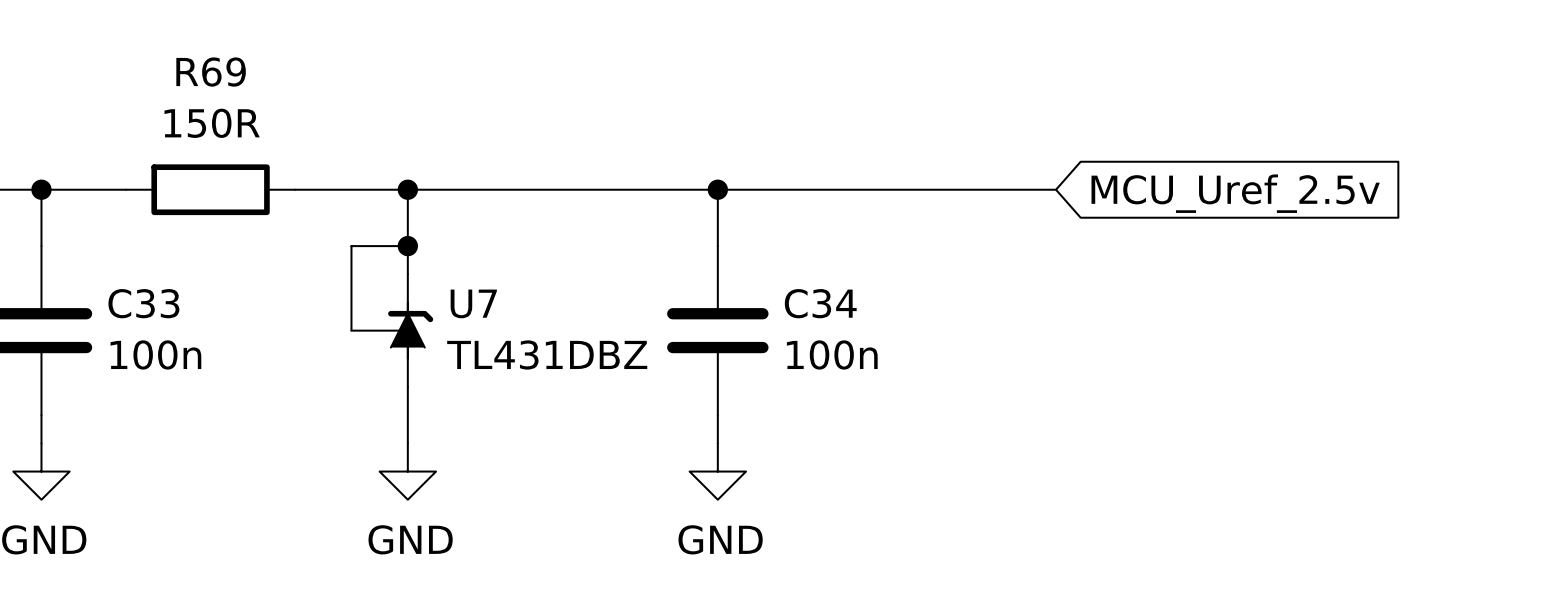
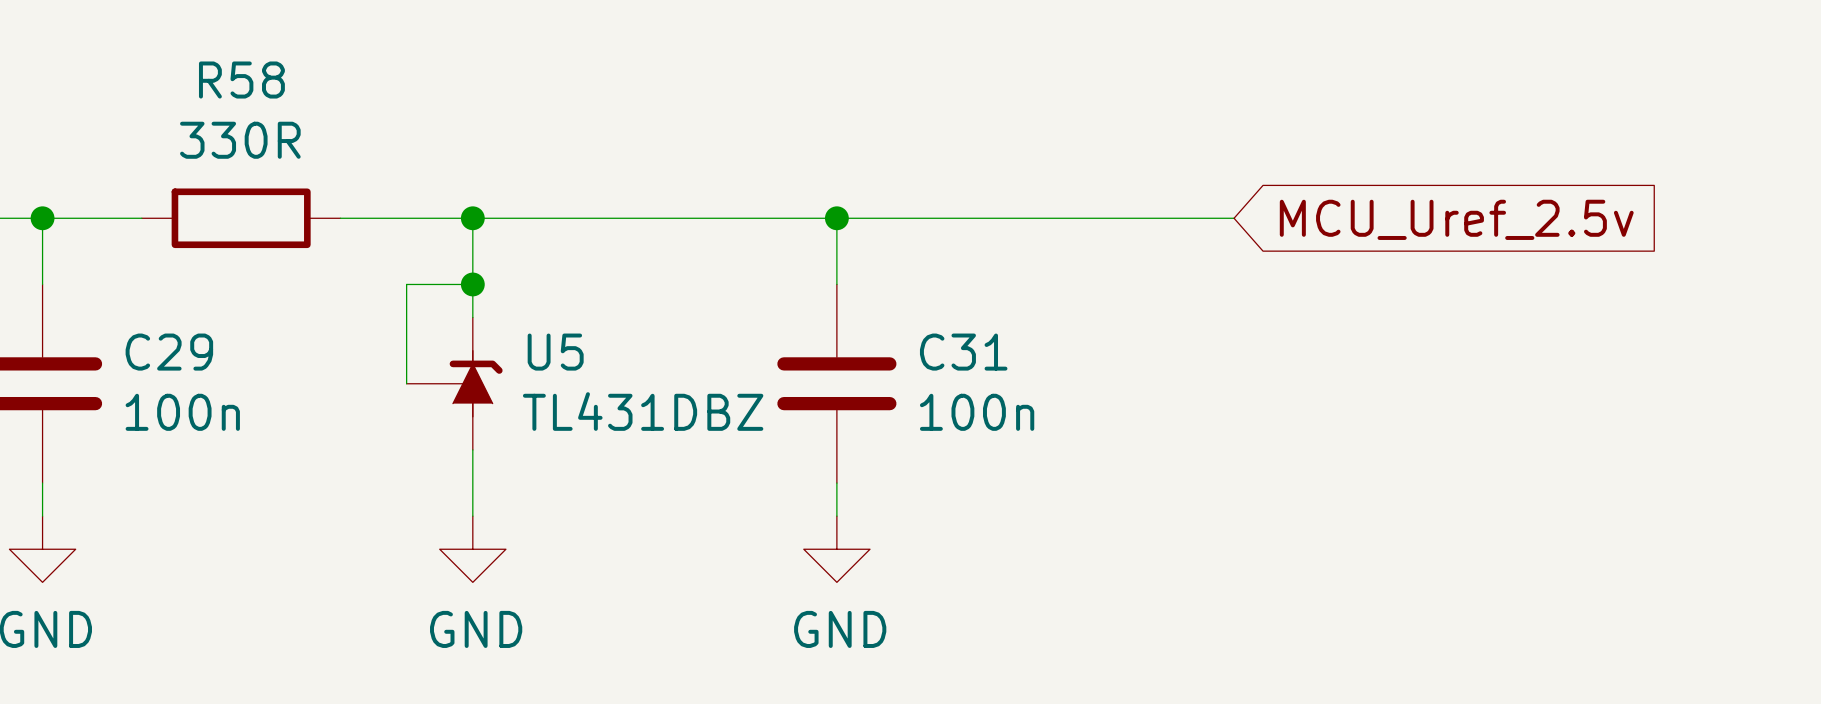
R69 name: R69 (211, 72) -> R58 (241, 80)
R69 value: 150R (212, 123) -> 330R (240, 140)
C33 name: C33 (143, 303) -> C29 (169, 352)
U7 name: U7 (473, 303) -> U5 (555, 352)
C34 name: C34 (820, 303) -> C31 (963, 352)

